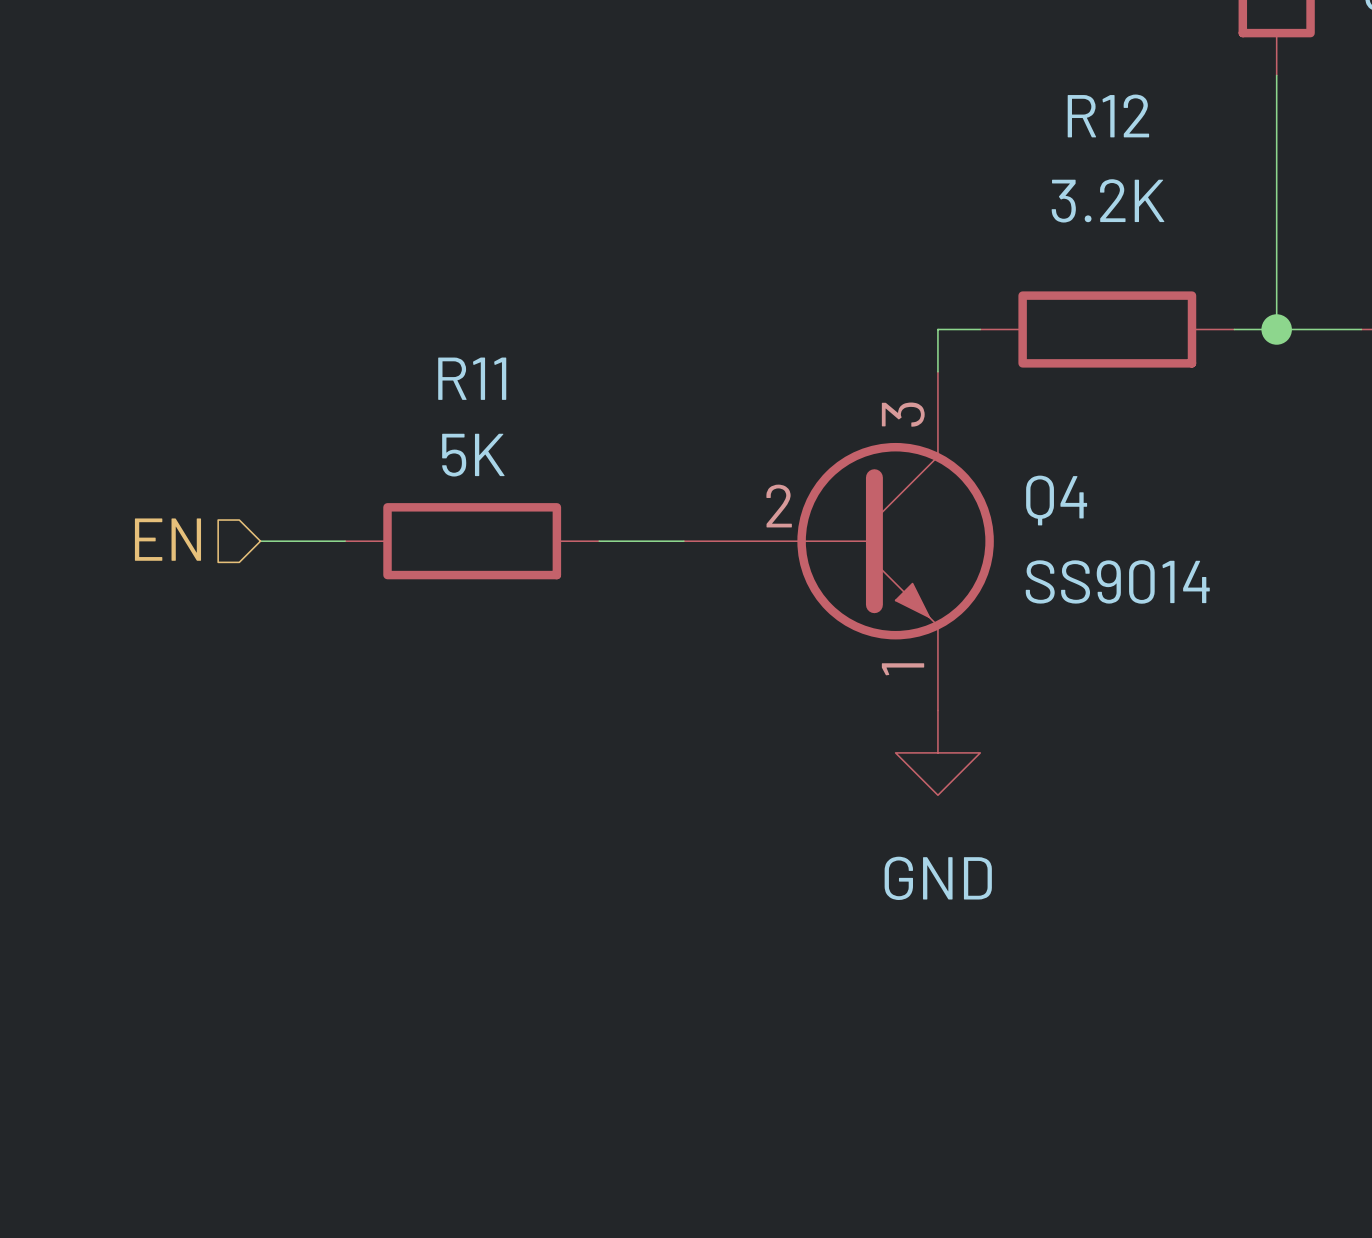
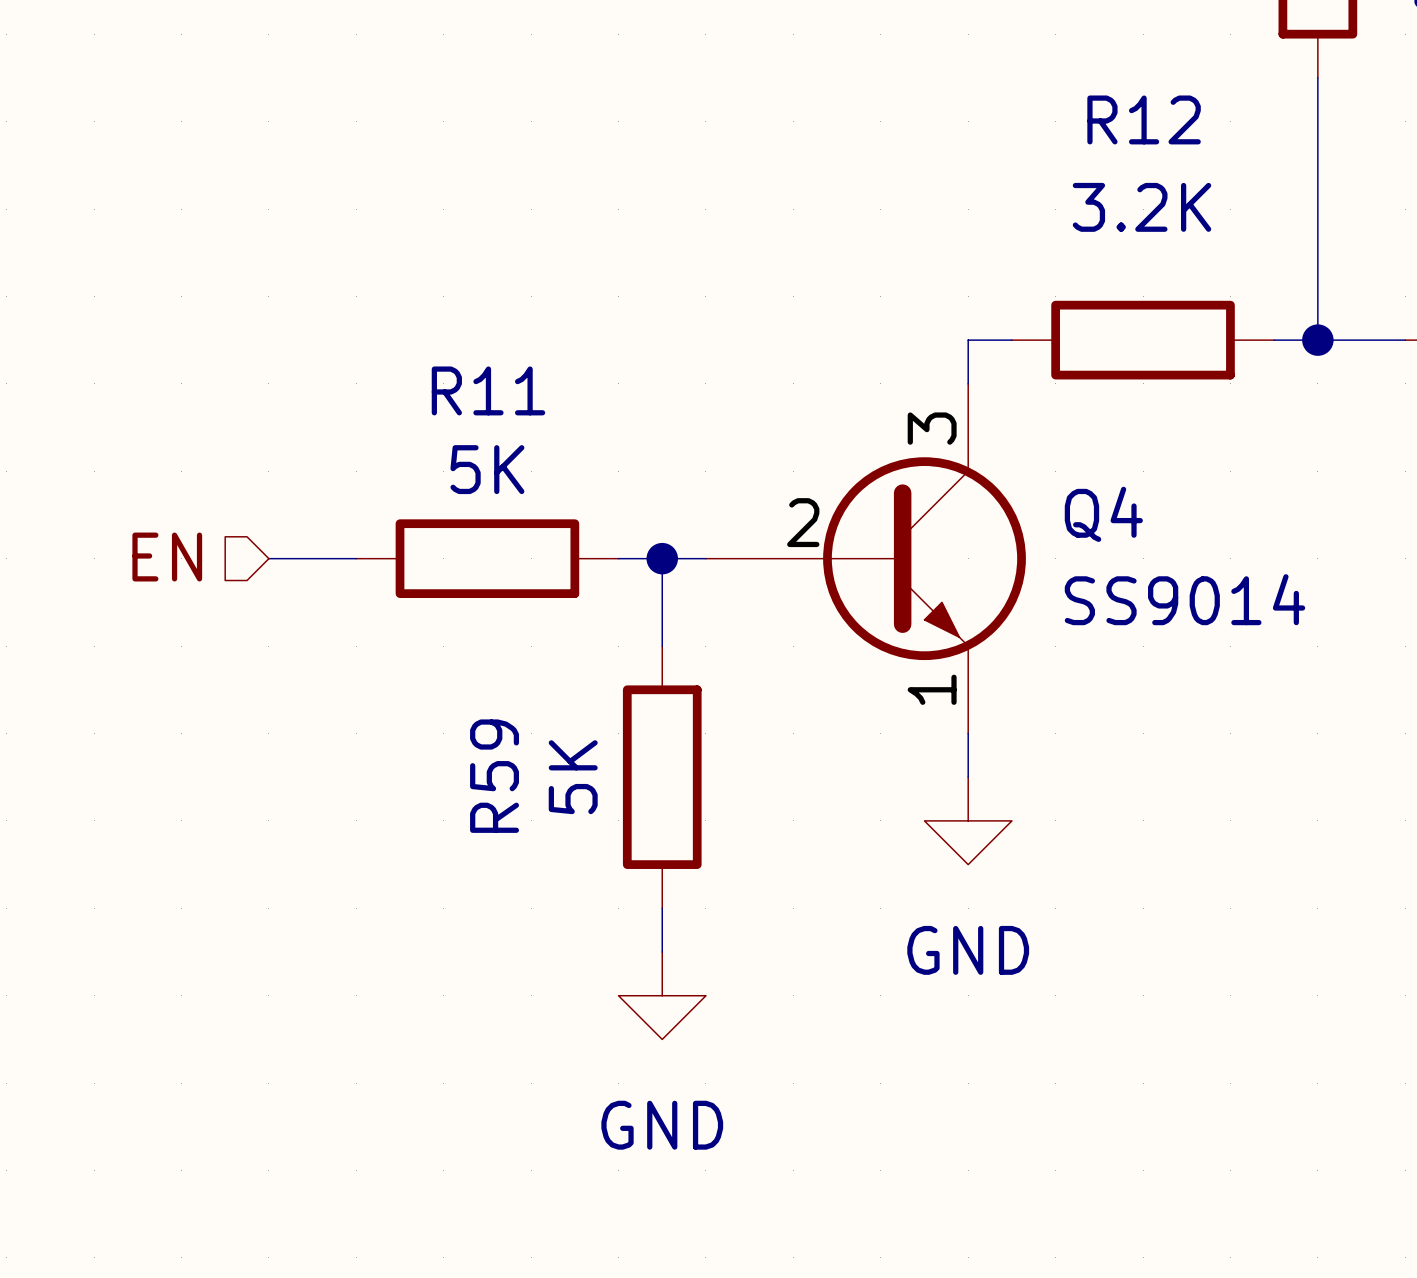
wire: none -> (662, 558) (662, 646)
junction: none -> (662, 558)
R59: none -> 5K (662, 777)
power symbol position: GND (937, 752) -> GND (968, 820)
wire: none -> (662, 908) (662, 952)
power symbol: none -> GND (662, 995)

